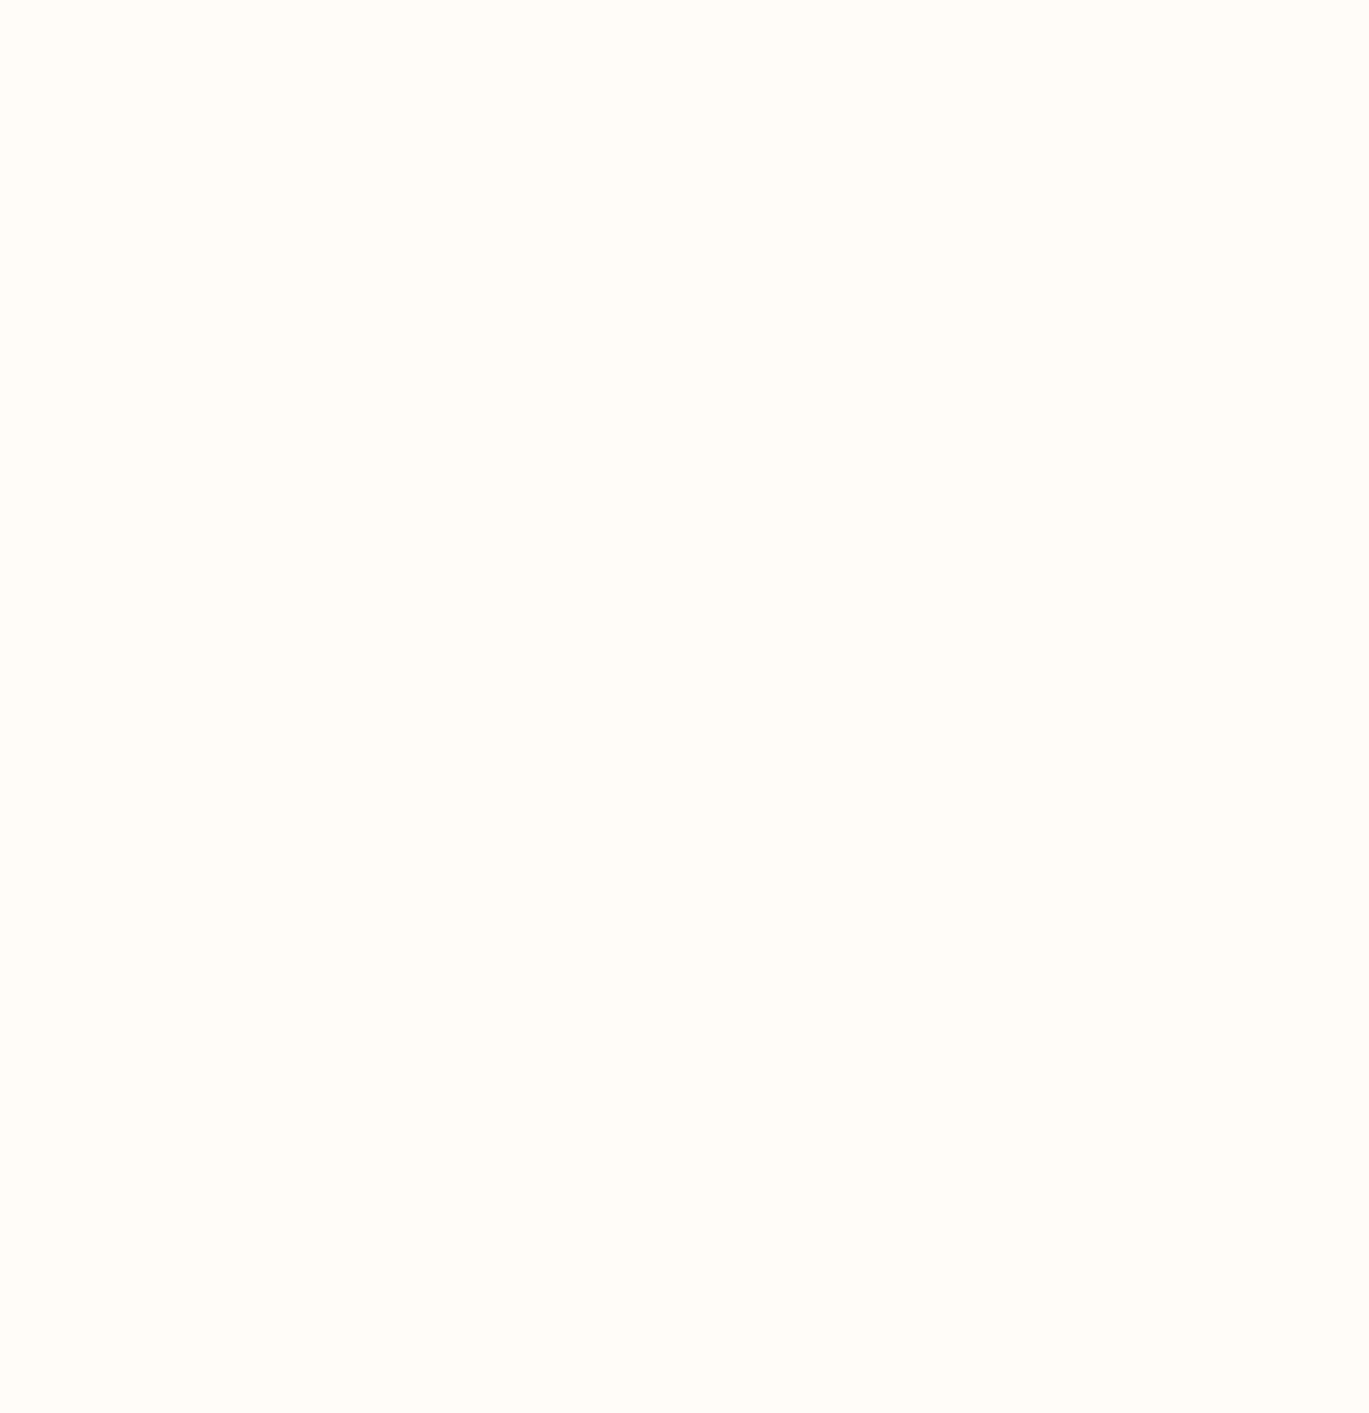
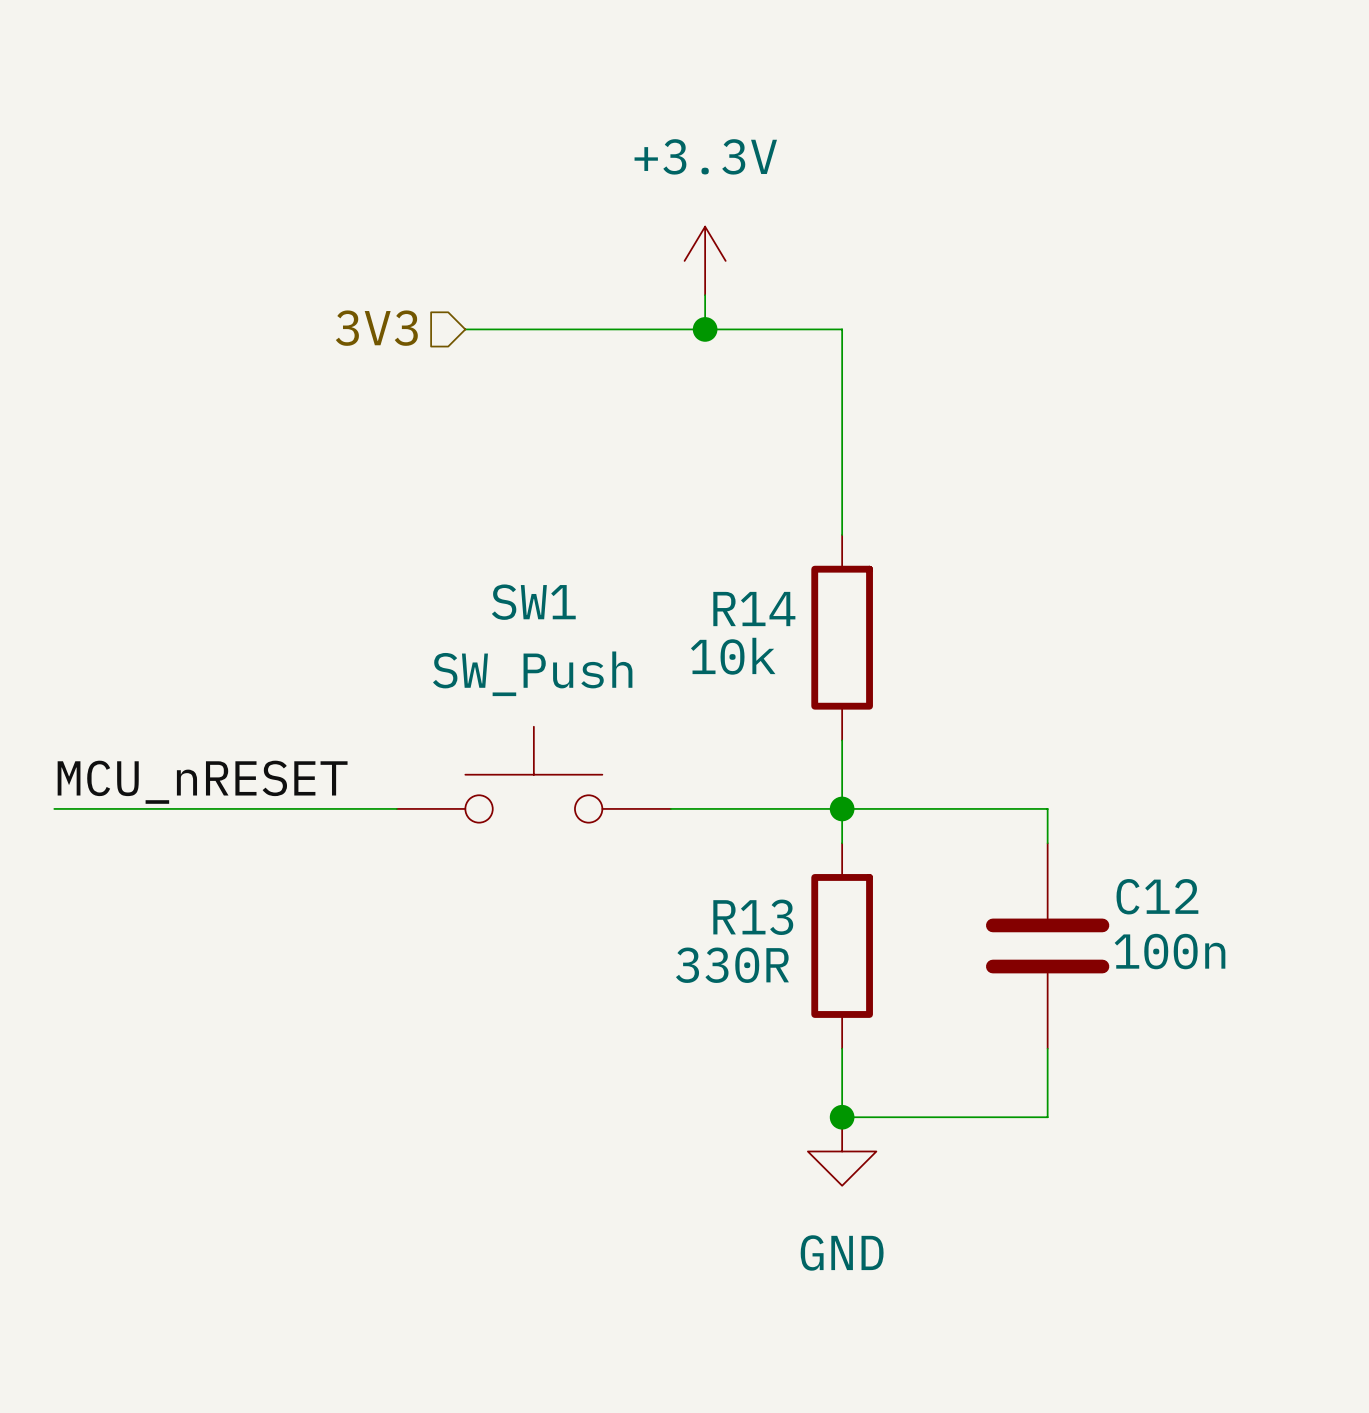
power symbol: none -> +3.3V (705, 260)
wire: none -> (705, 295) (705, 329)
hierarchical label: none -> 3V3 (376, 328)
wire: none -> (465, 329) (842, 329) (842, 534)
junction: none -> (705, 329)
R14: none -> 10k (842, 637)
wire: none -> (842, 740) (842, 843)
SW1: none -> SW_Push (533, 774)
label: none -> MCU_nRESET (202, 782)
wire: none -> (54, 808) (396, 808)
wire: none -> (670, 808) (1047, 808) (1047, 843)
junction: none -> (842, 808)
R13: none -> 330R (842, 945)
C12: none -> 100n (1047, 945)
wire: none -> (842, 1048) (842, 1117) (1047, 1117) (1047, 1048)
junction: none -> (842, 1117)
power symbol: none -> GND (842, 1151)

